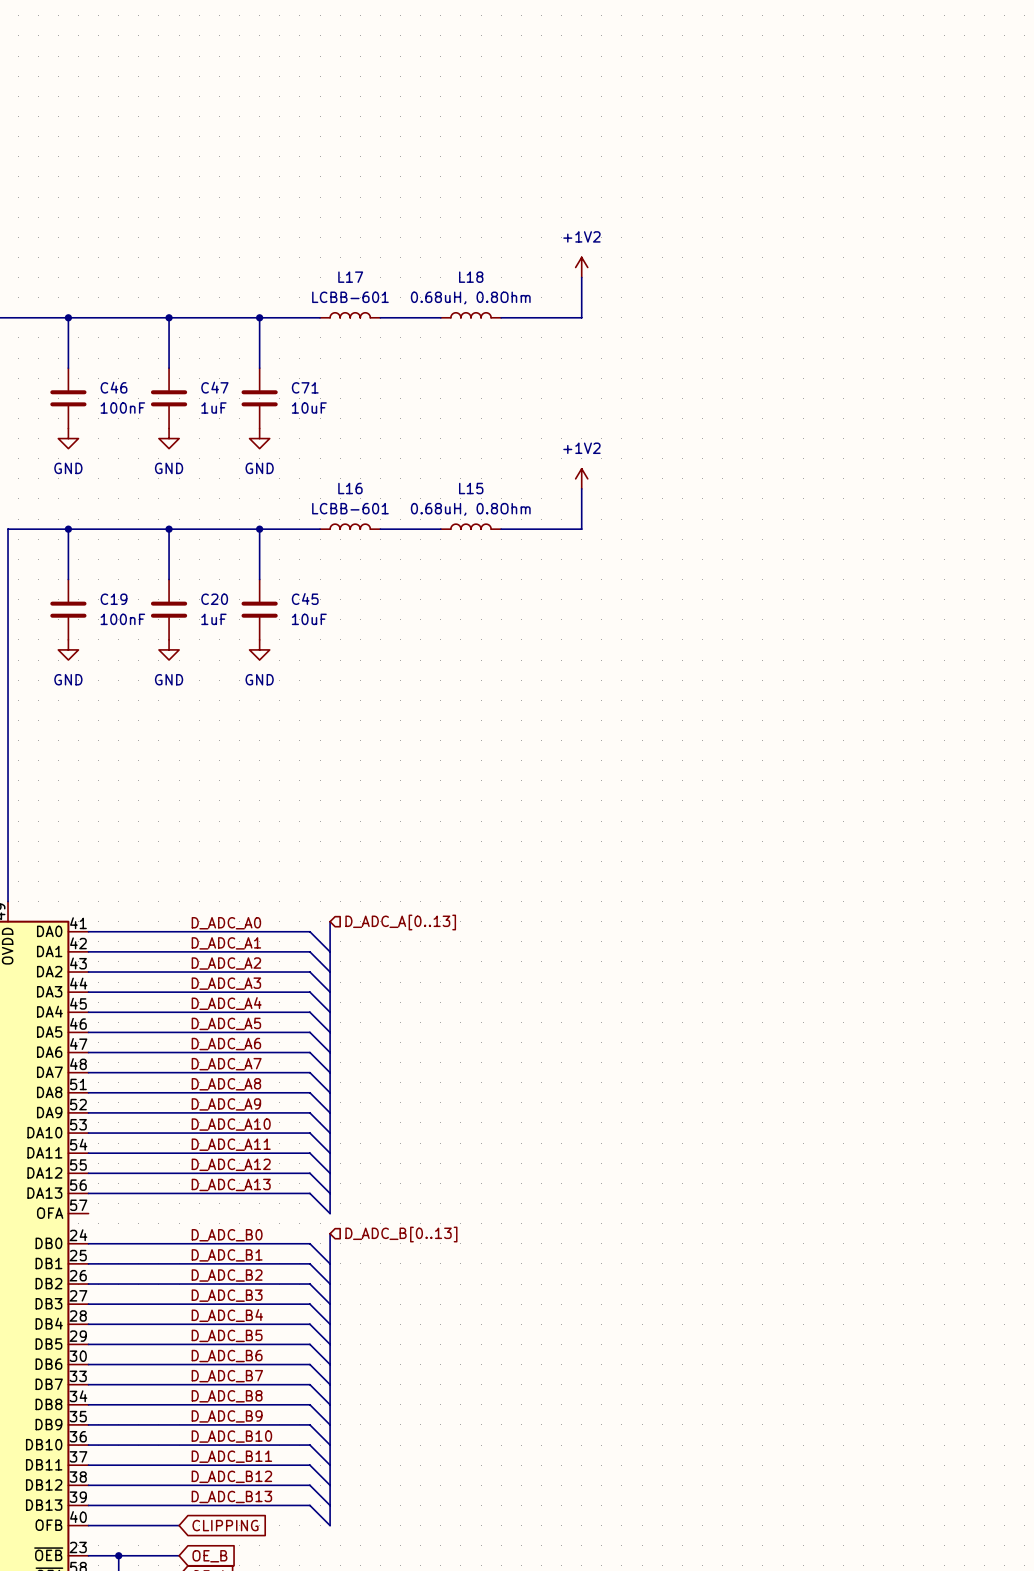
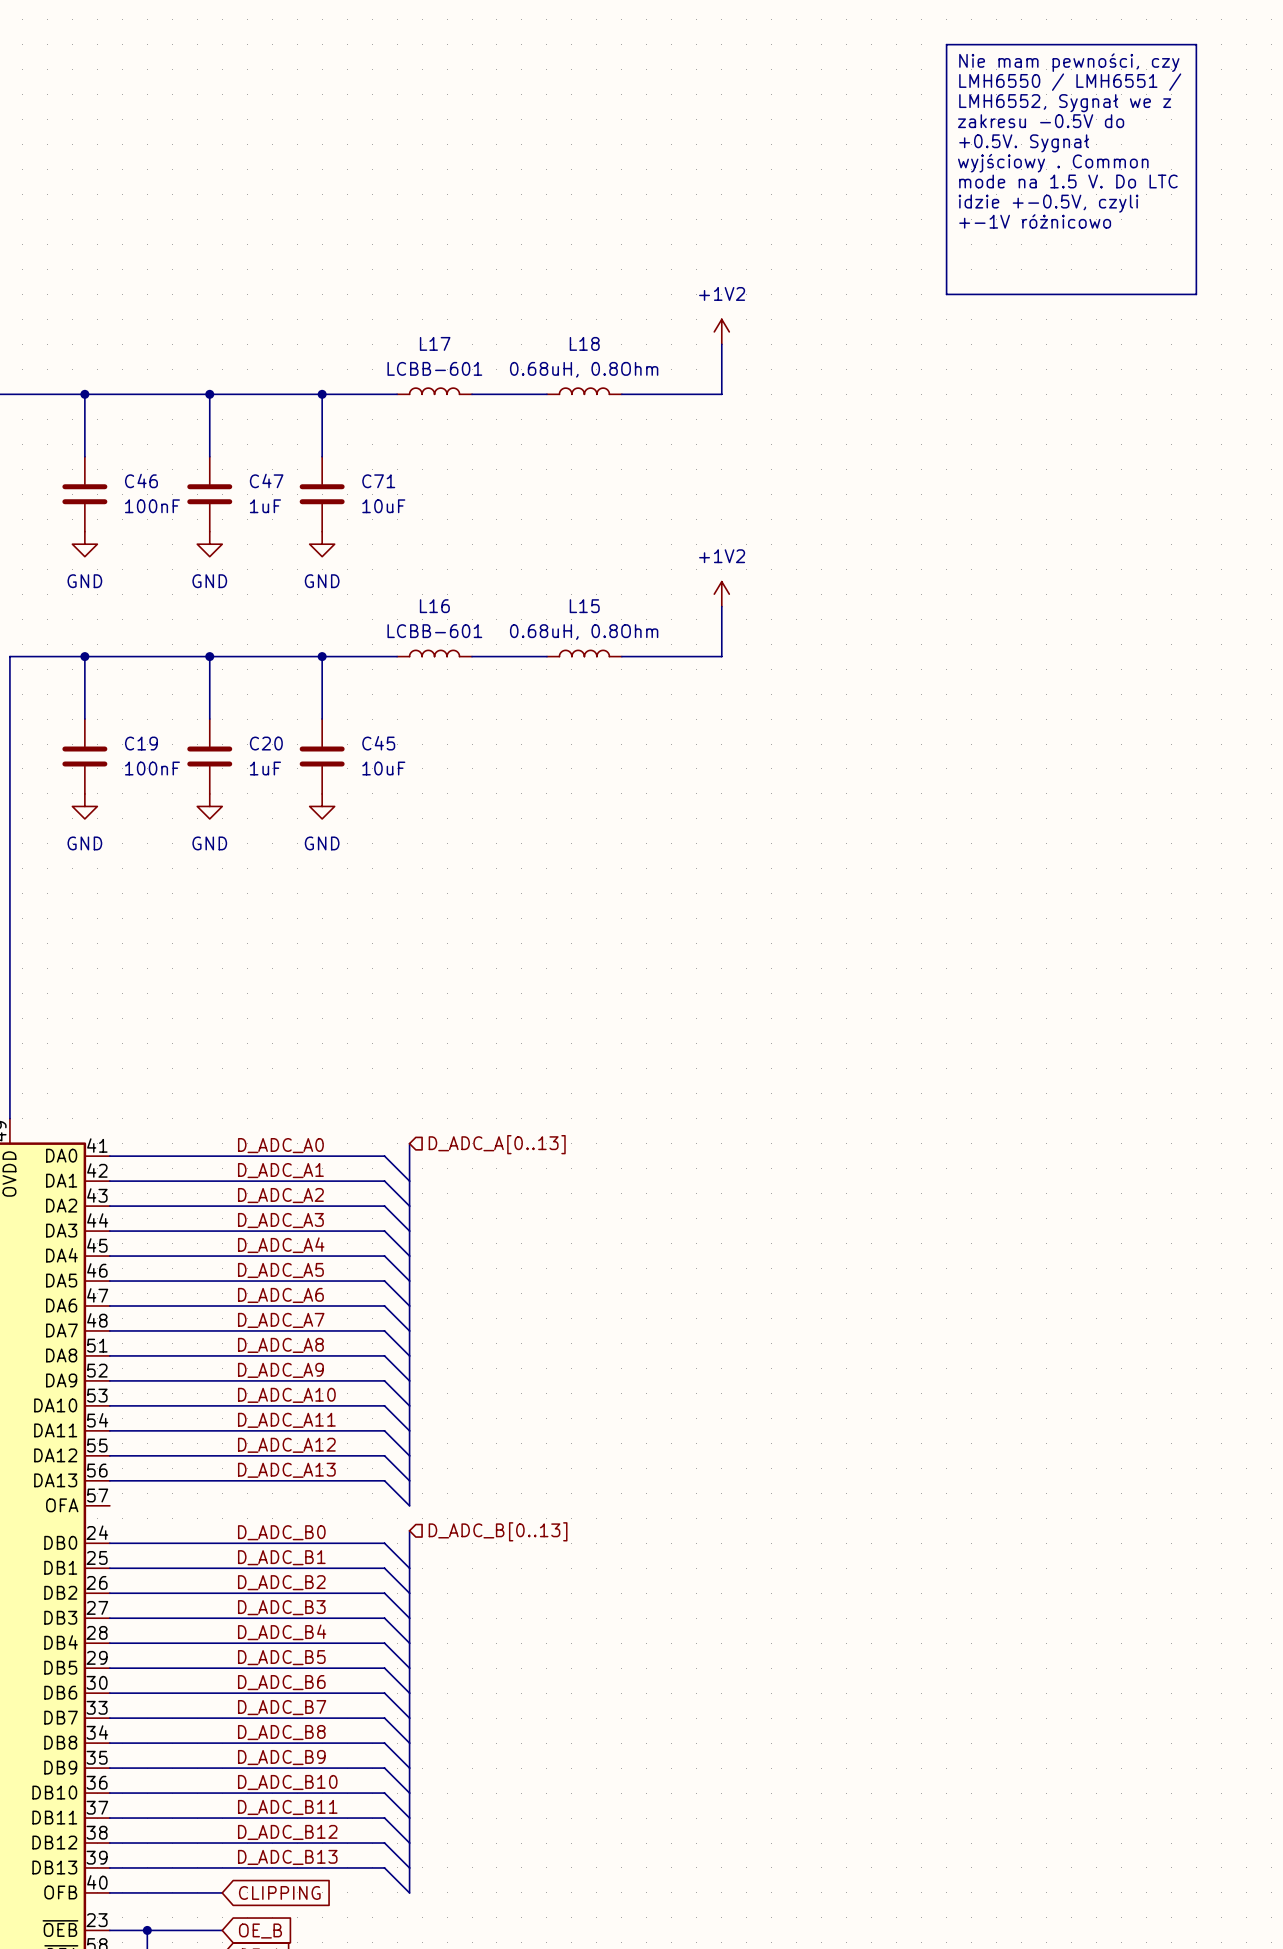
line: none -> (946, 44) (1196, 44) (1196, 294) (946, 294) (946, 44)
text: none -> Nie mam pewności, czy (1069, 62)
text: none -> LMH6550 / LMH6551 / (1070, 82)
text: none -> LMH6552, Sygnał we z (1065, 103)
text: none -> zakresu -0.5V do (1041, 121)
text: none -> +0.5V. Sygnał (1024, 143)
text: none -> wyjściowy . Common (1053, 163)
text: none -> mode na 1.5 V. Do LTC (1068, 181)
text: none -> idzie +-0.5V, czyli (1048, 203)
text: none -> +-1V różnicowo (1035, 221)

